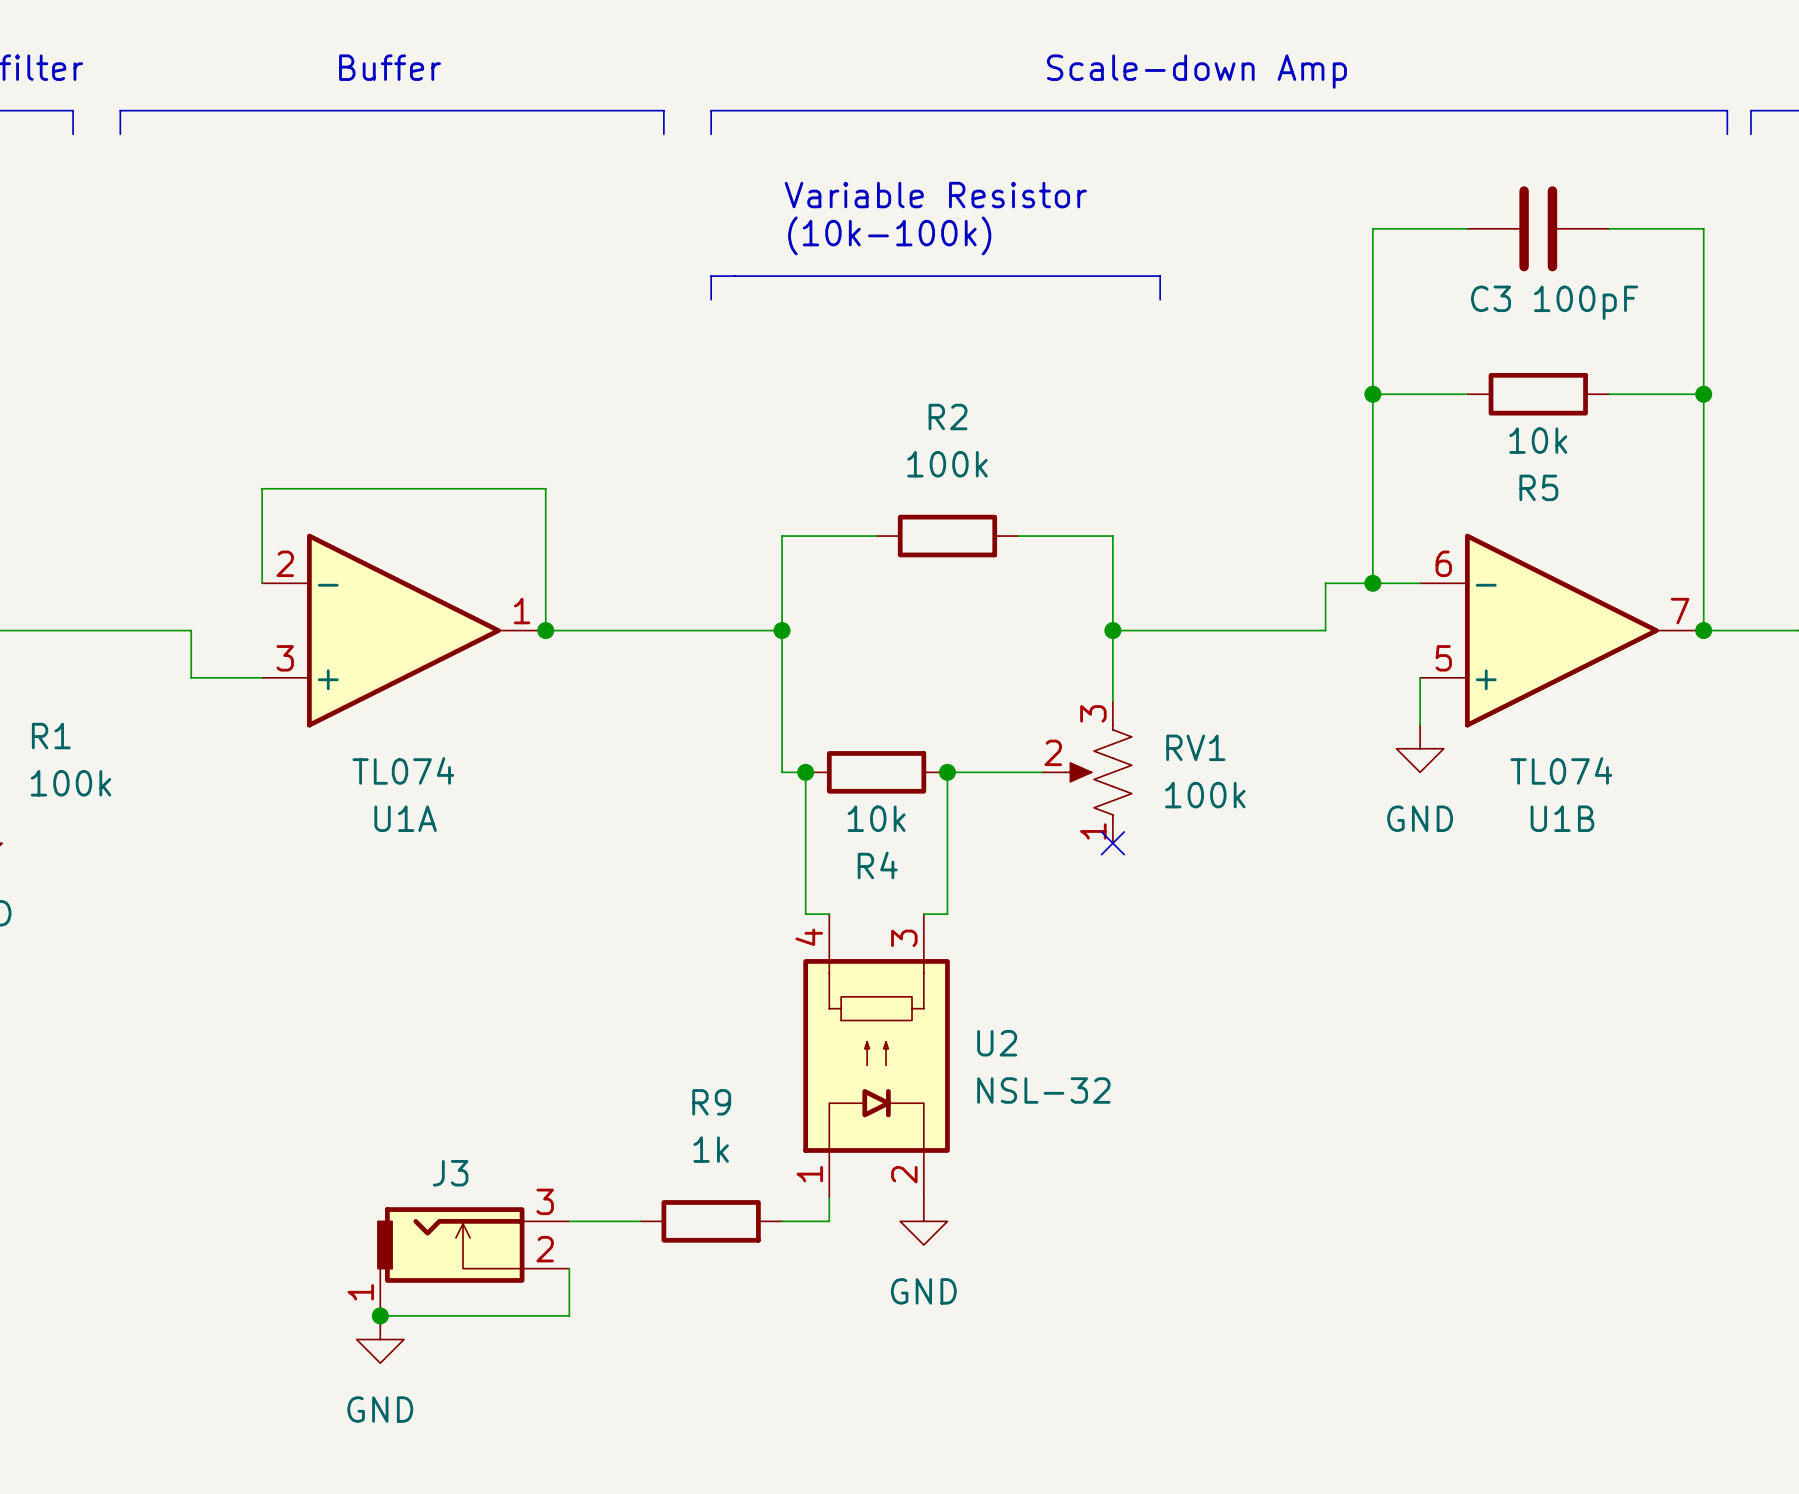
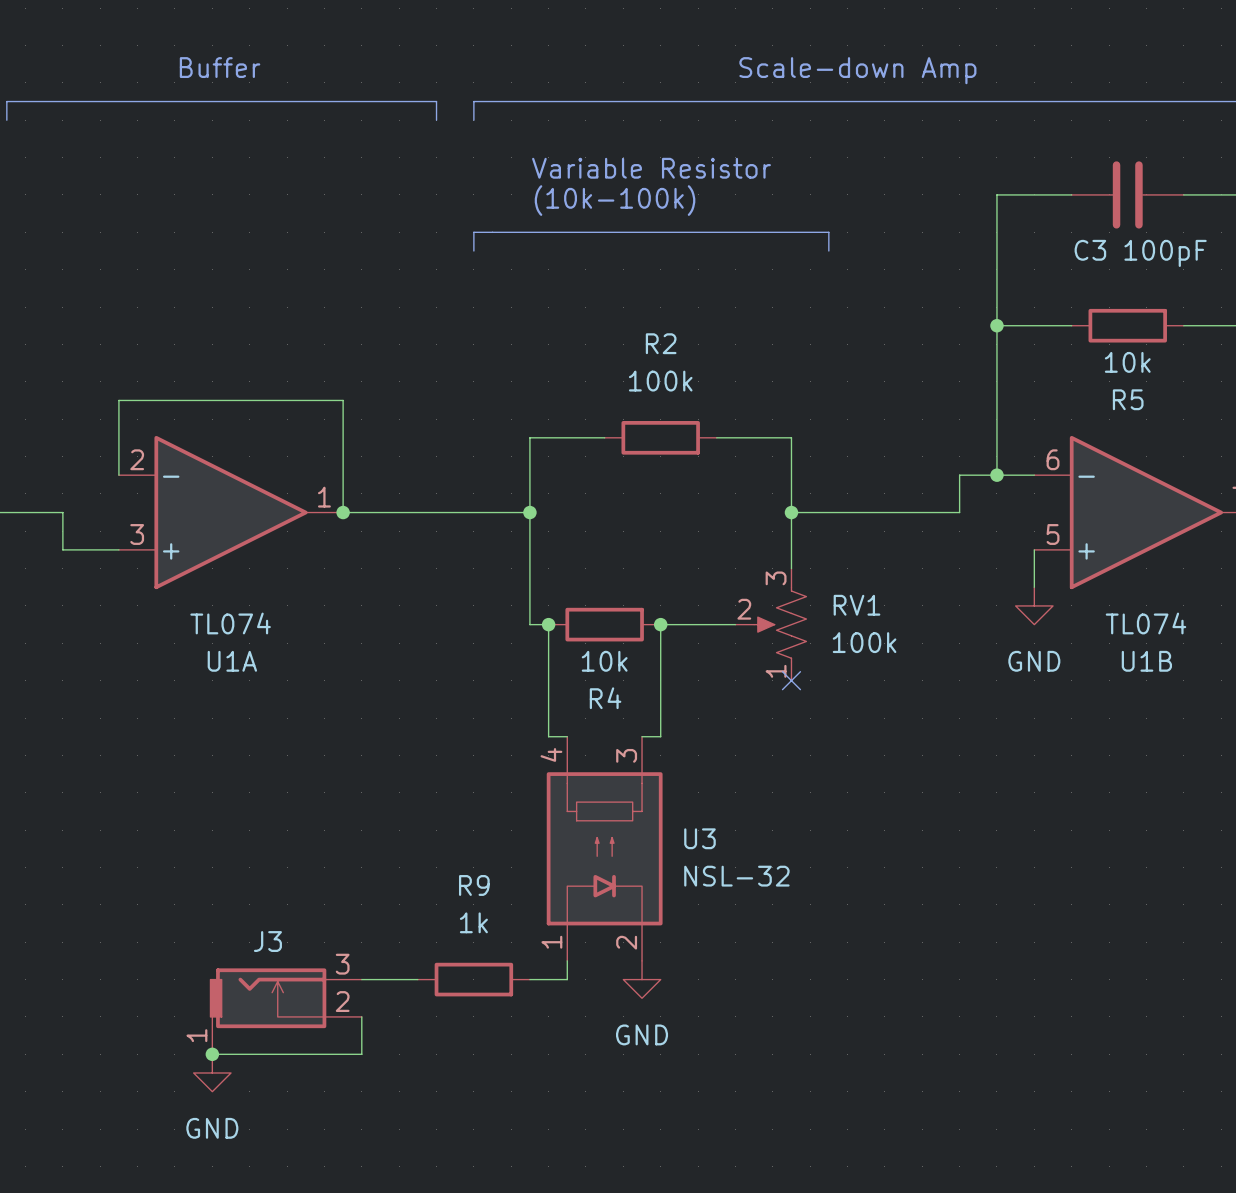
U2 name: U2 (997, 1043) -> U3 (699, 838)

